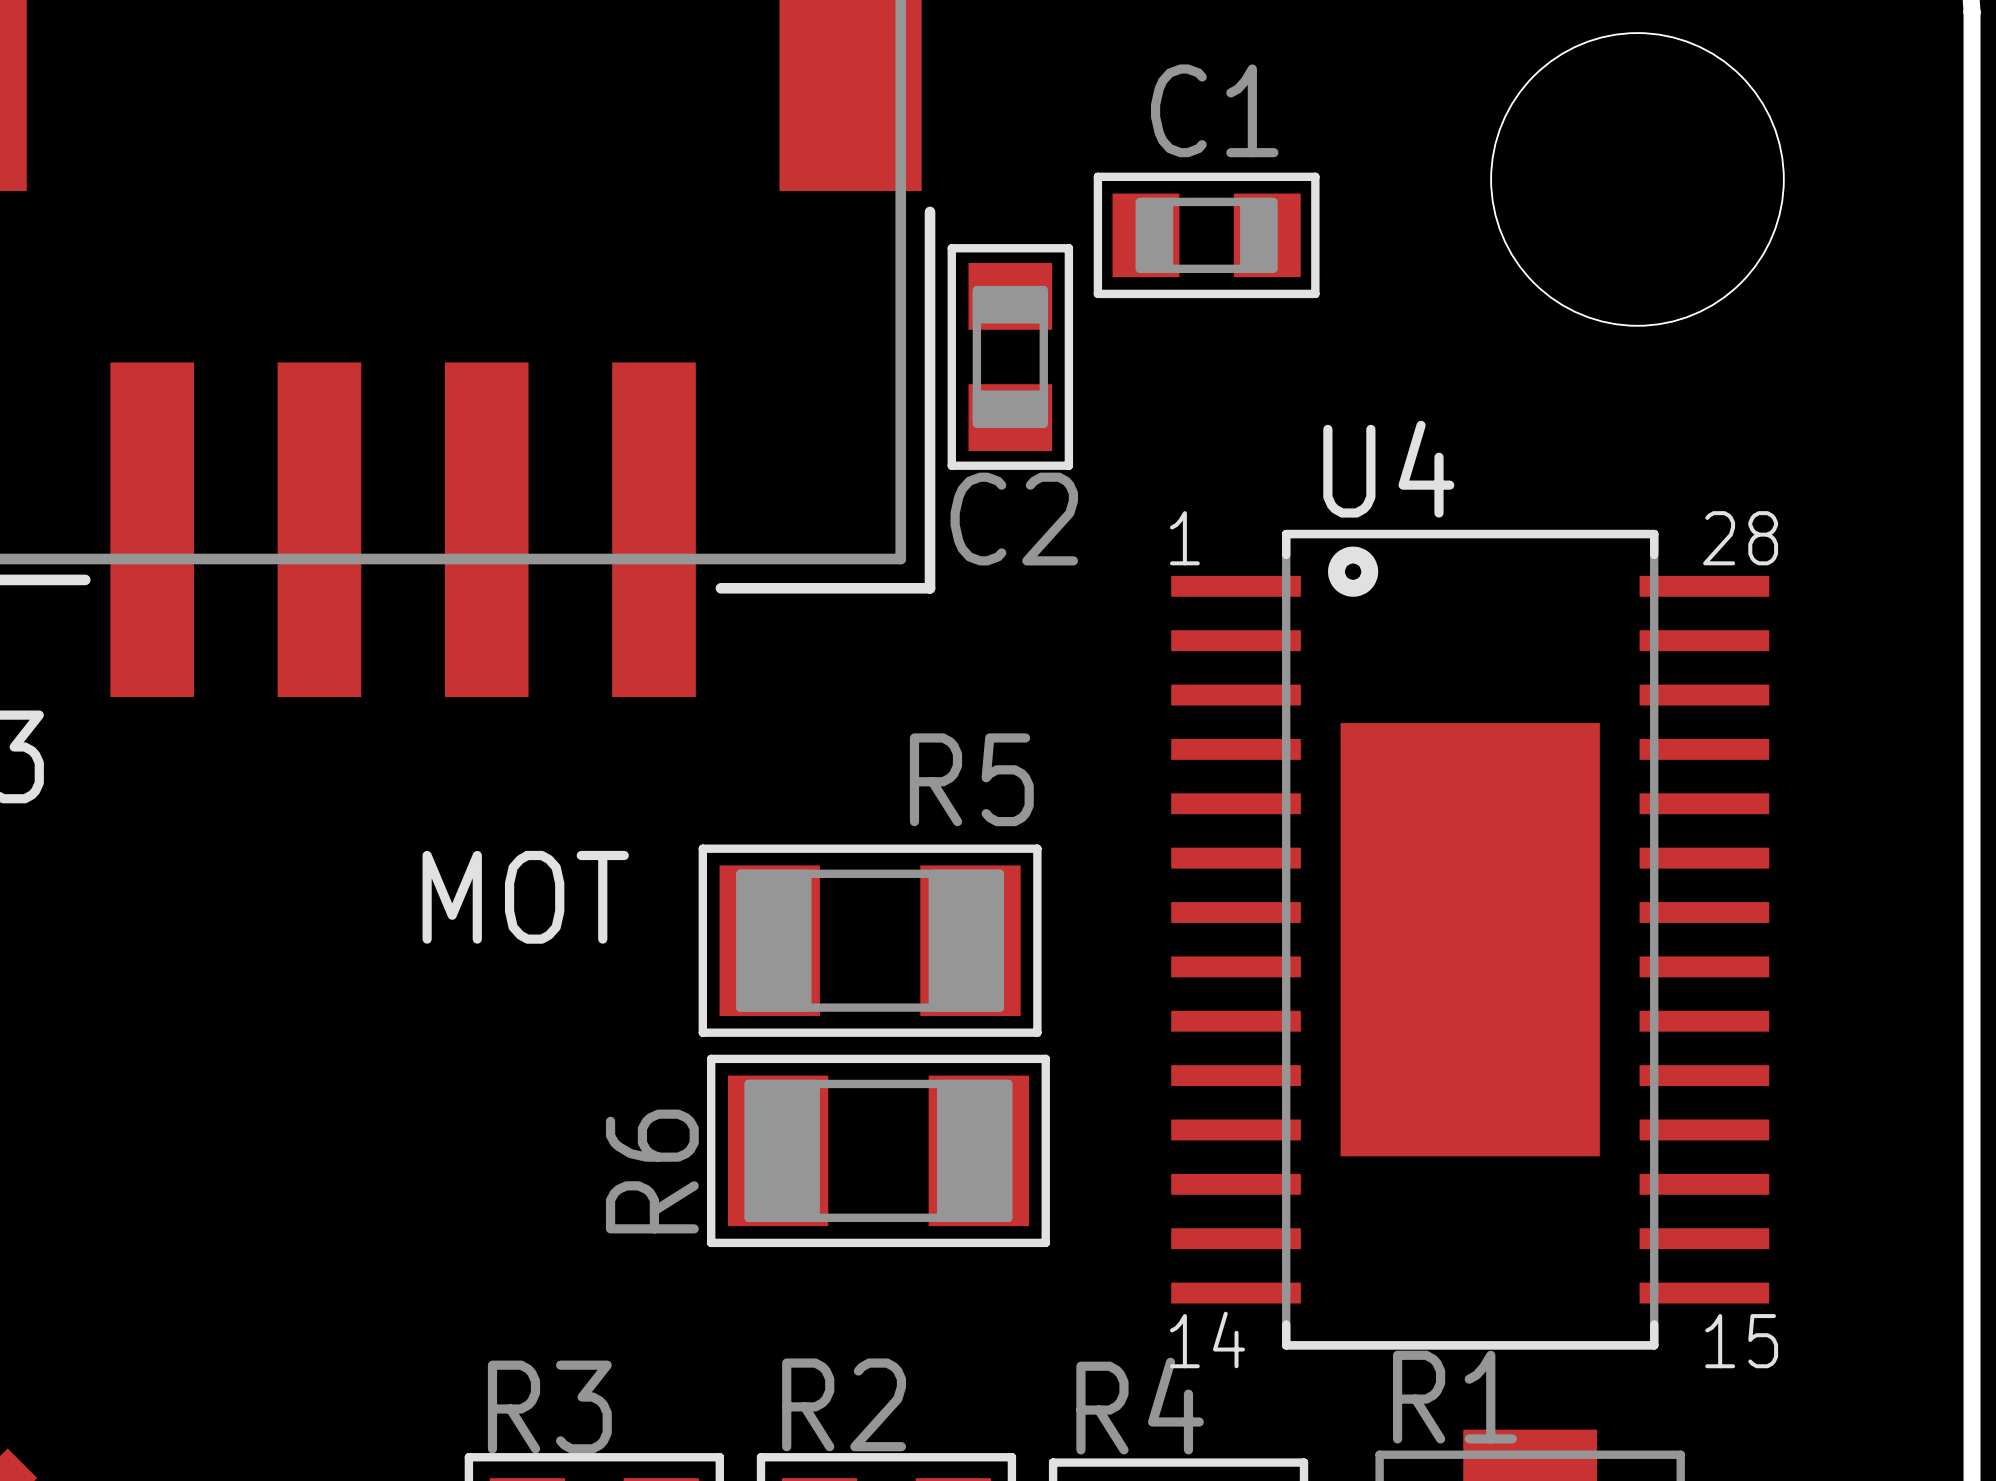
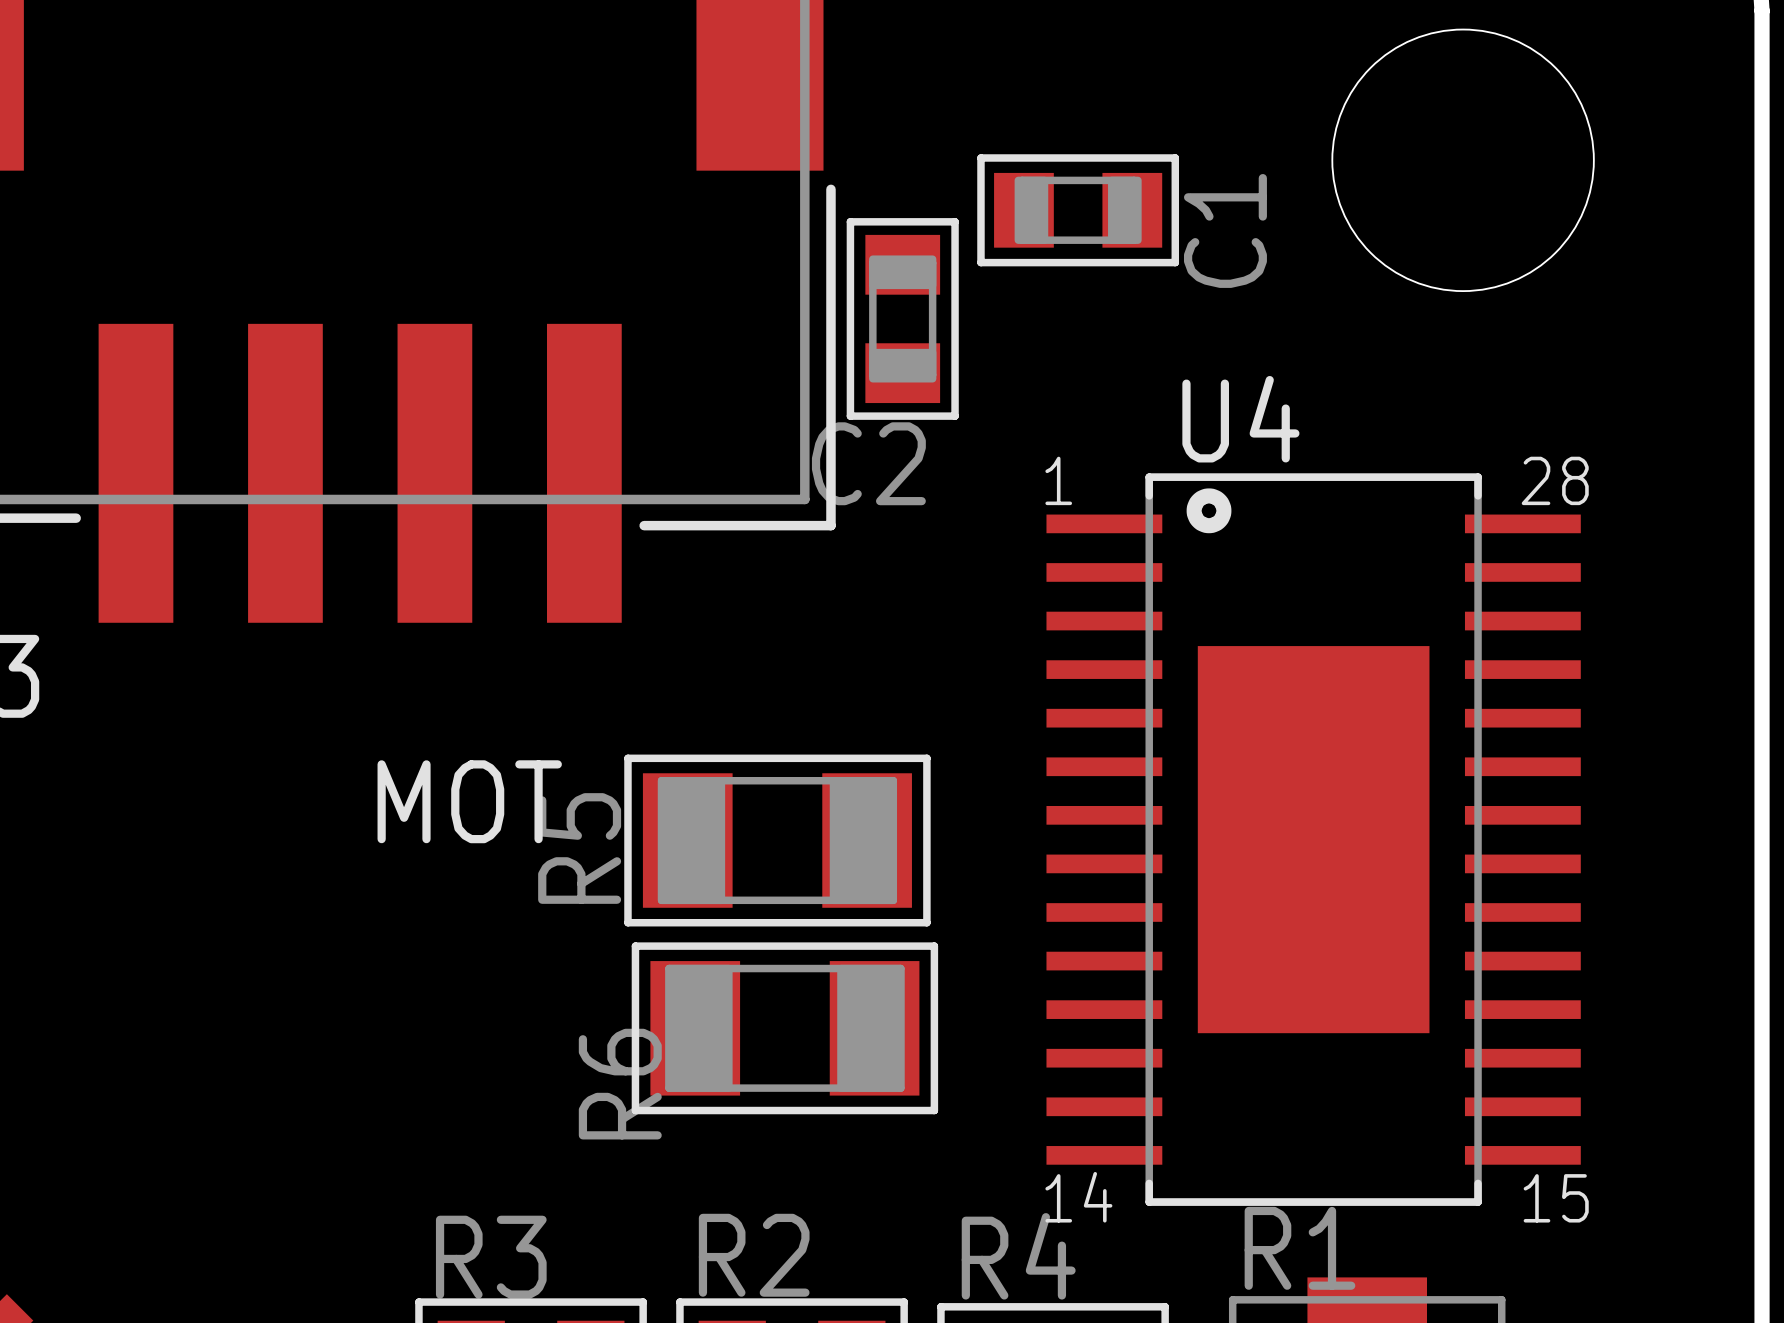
C1 name rotation: 0° (1214, 110) -> 90° counterclockwise (1225, 230)
C1 name position: C1 (1214, 110) -> C1 (1225, 230)
C2 name position: C2 (1014, 519) -> C2 (868, 463)
R5 name rotation: 0° (971, 779) -> 90° counterclockwise (579, 848)
R5 name position: R5 (971, 779) -> R5 (579, 848)
R6 name position: R6 (652, 1171) -> R6 (620, 1084)

